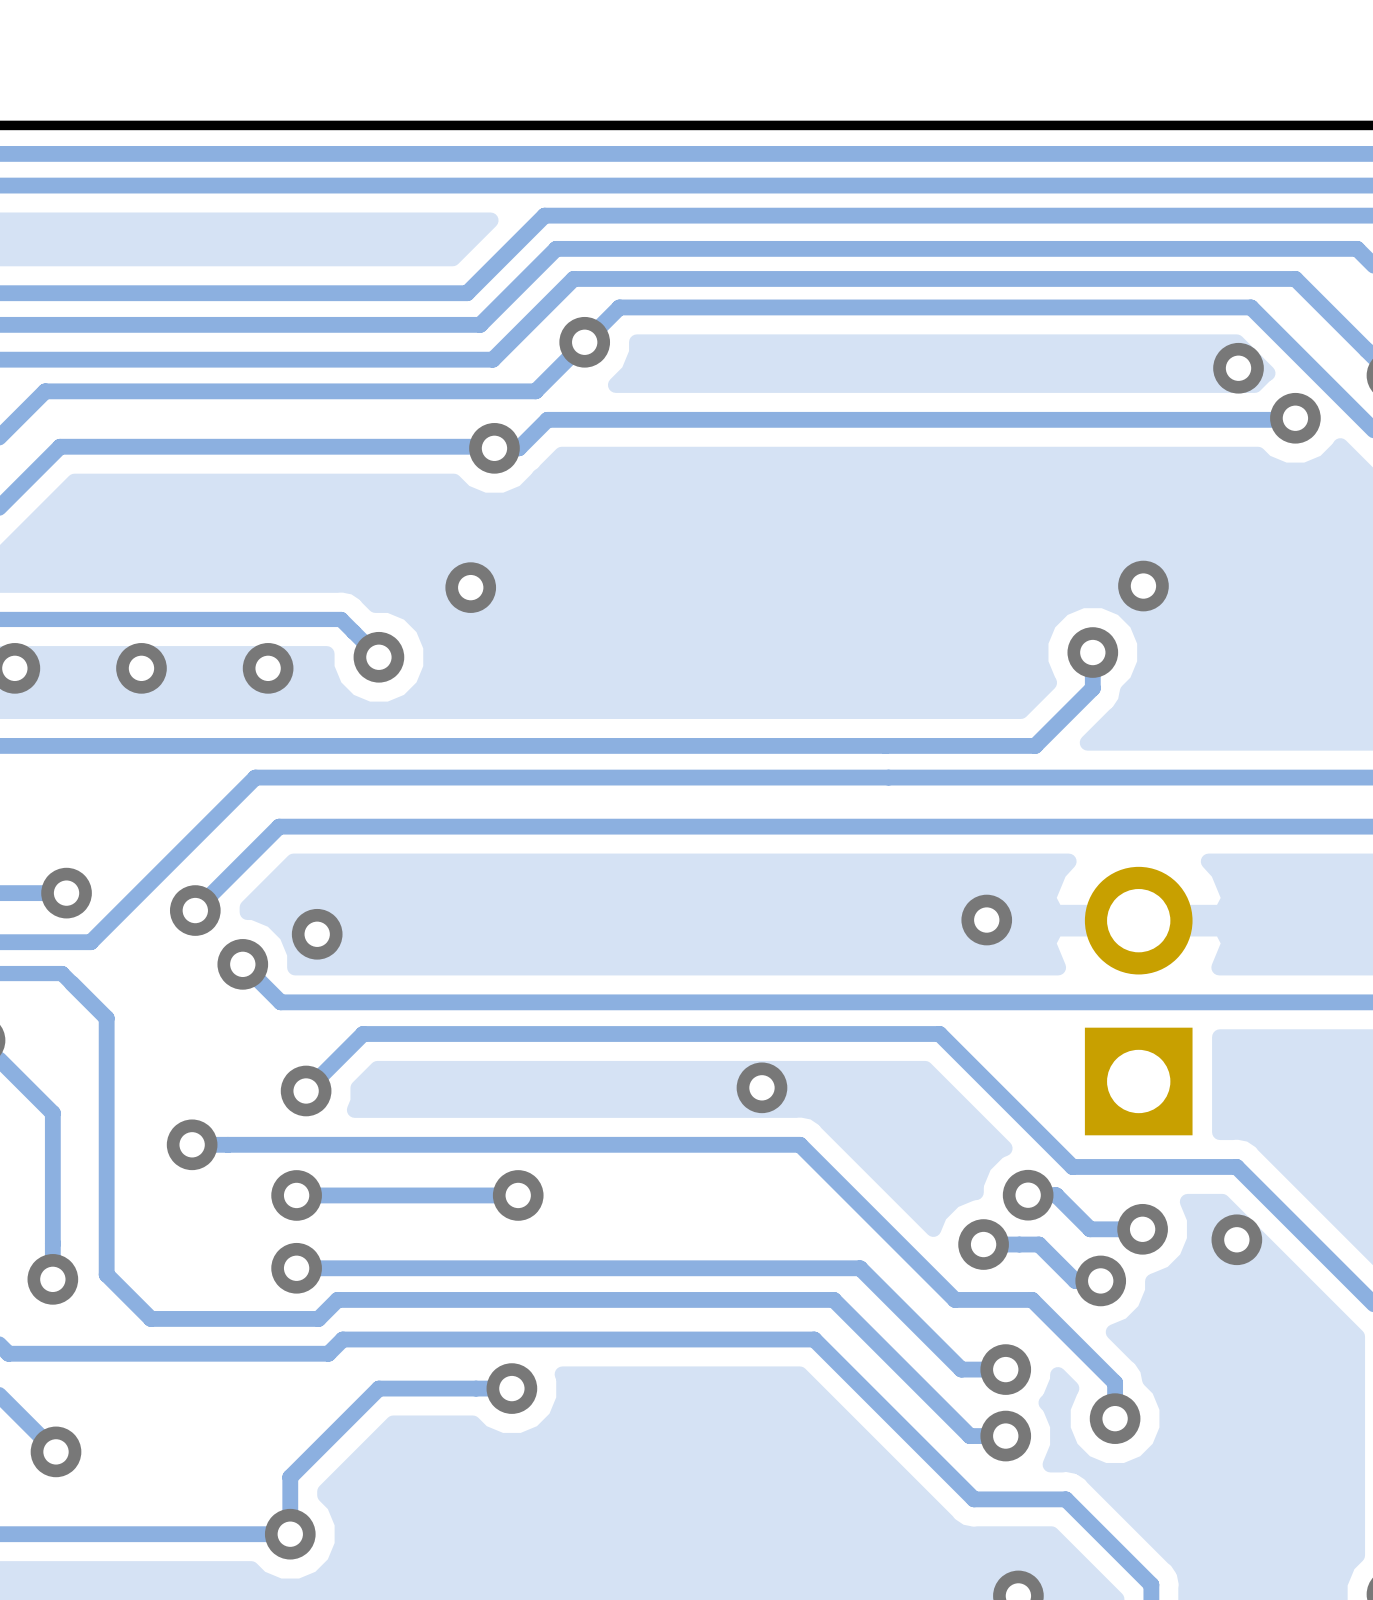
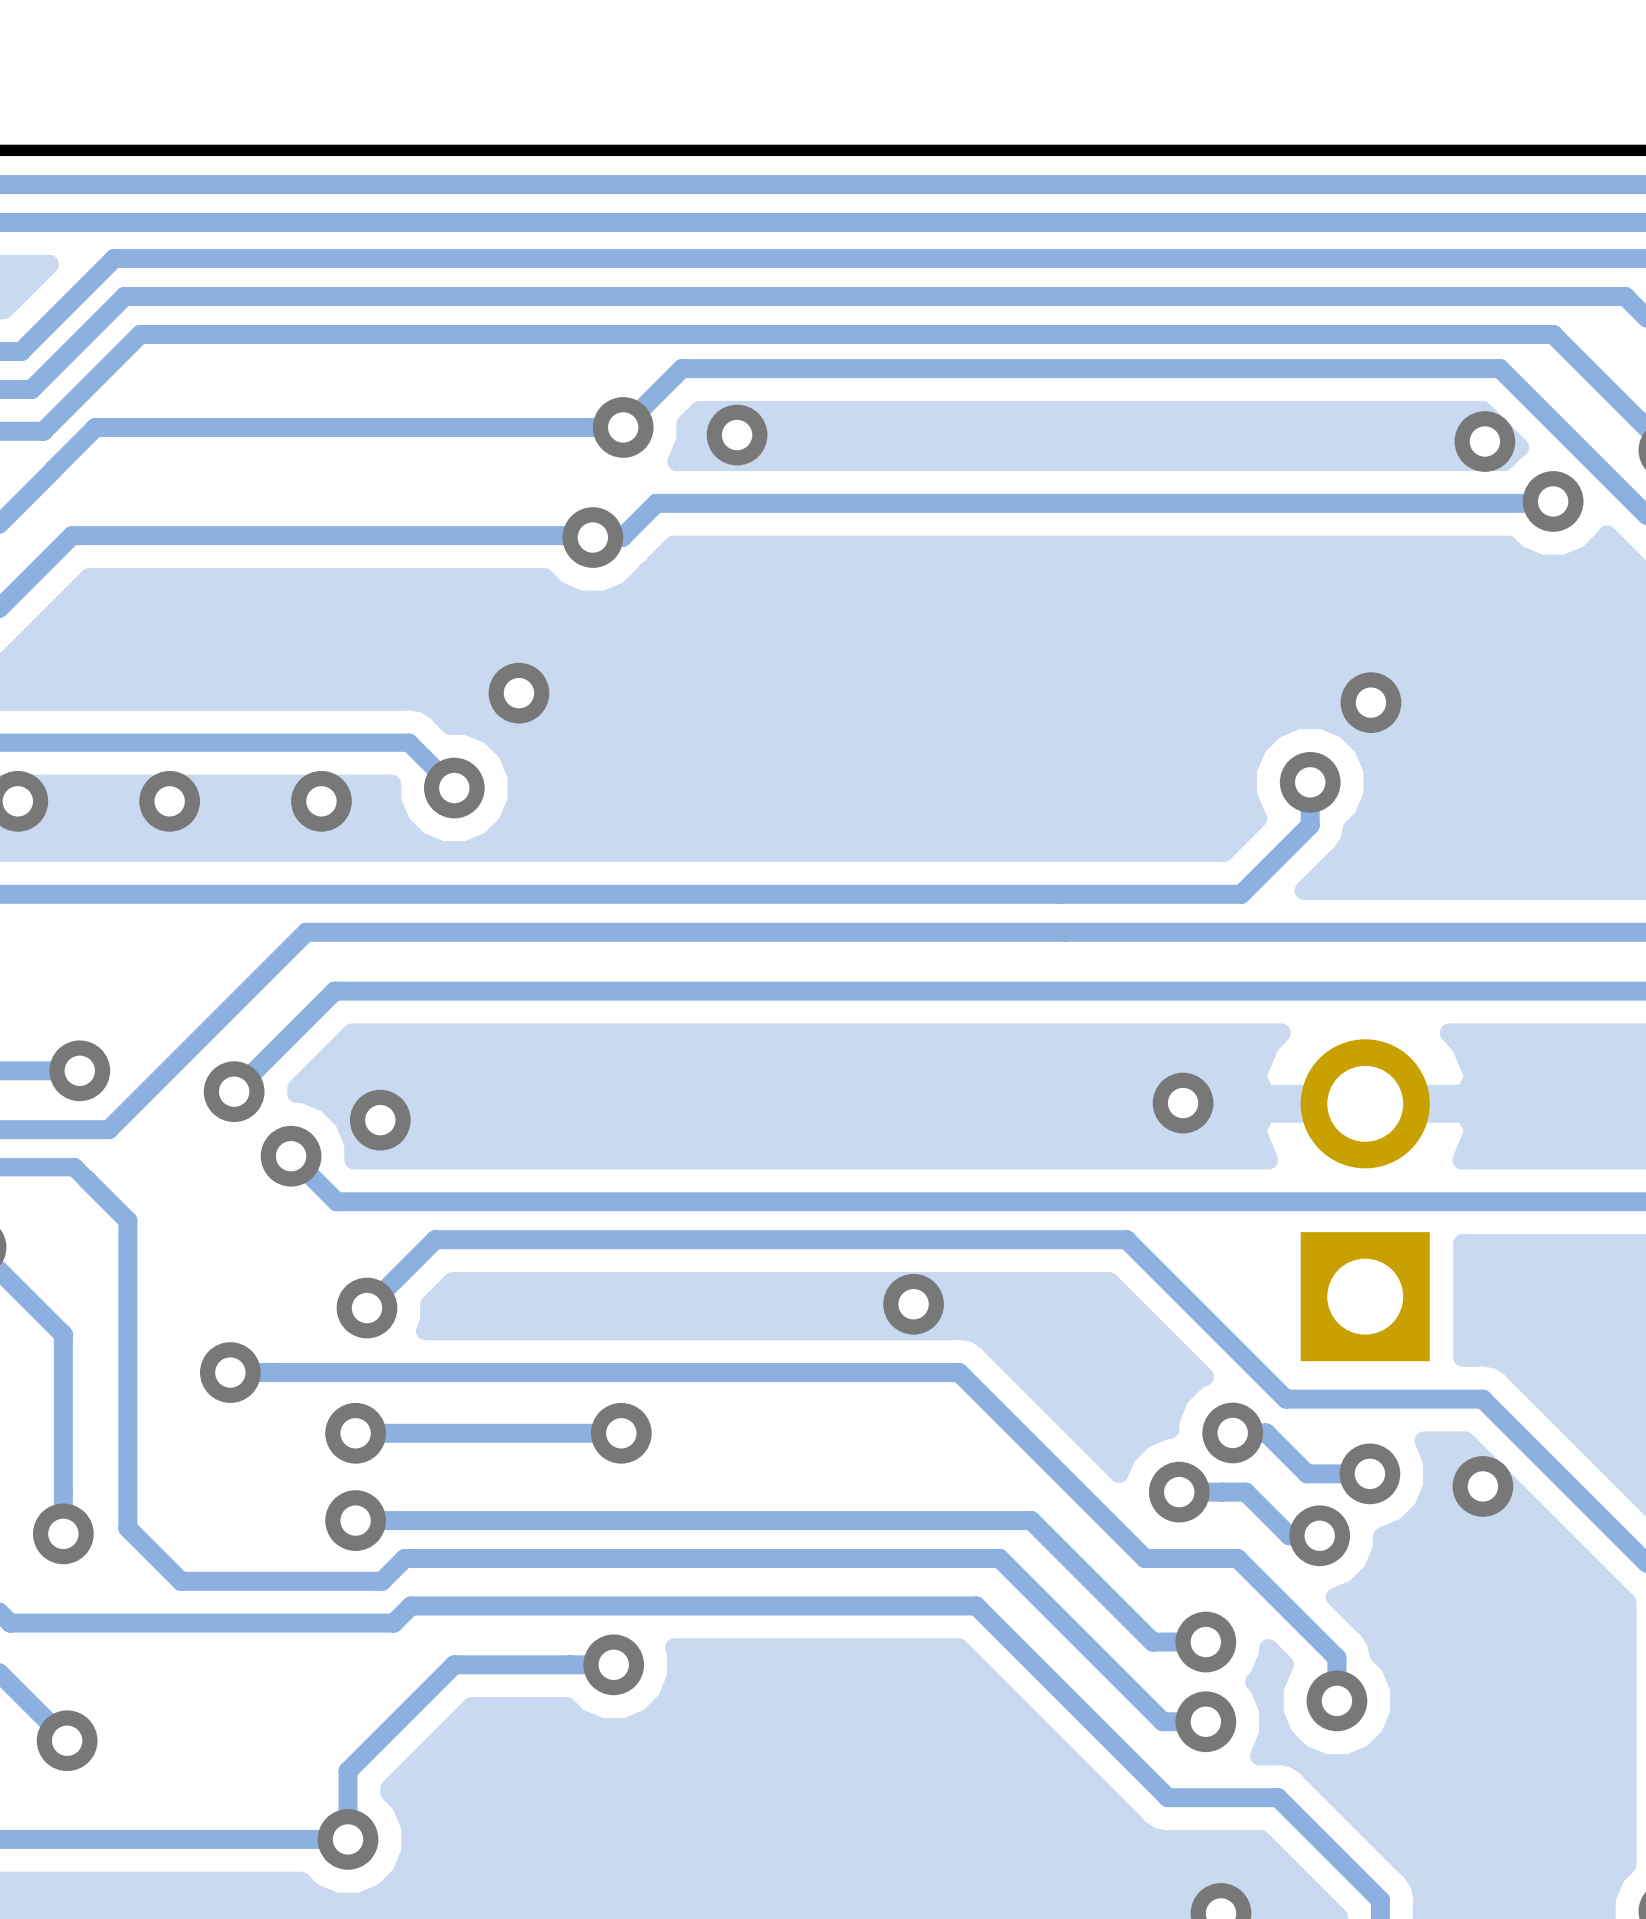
track: (544, 215) (467, 293) (17, 293) -> (653, 258) (114, 258) (21, 351)
track: (1357, 248) (556, 248) (480, 324) (26, 324) -> (1627, 298) (1625, 296) (124, 296) (31, 389)
track: (573, 278) (492, 359) (36, 359) -> (687, 334) (140, 334) (43, 431)
track: (619, 307) (535, 391) (45, 391) -> (627, 427) (95, 427) (54, 469)
track: none -> (742, 368) (682, 368) (625, 425)
via position: (584, 342) -> (737, 435)
via: none -> (623, 427)
via position: (470, 587) -> (518, 693)

